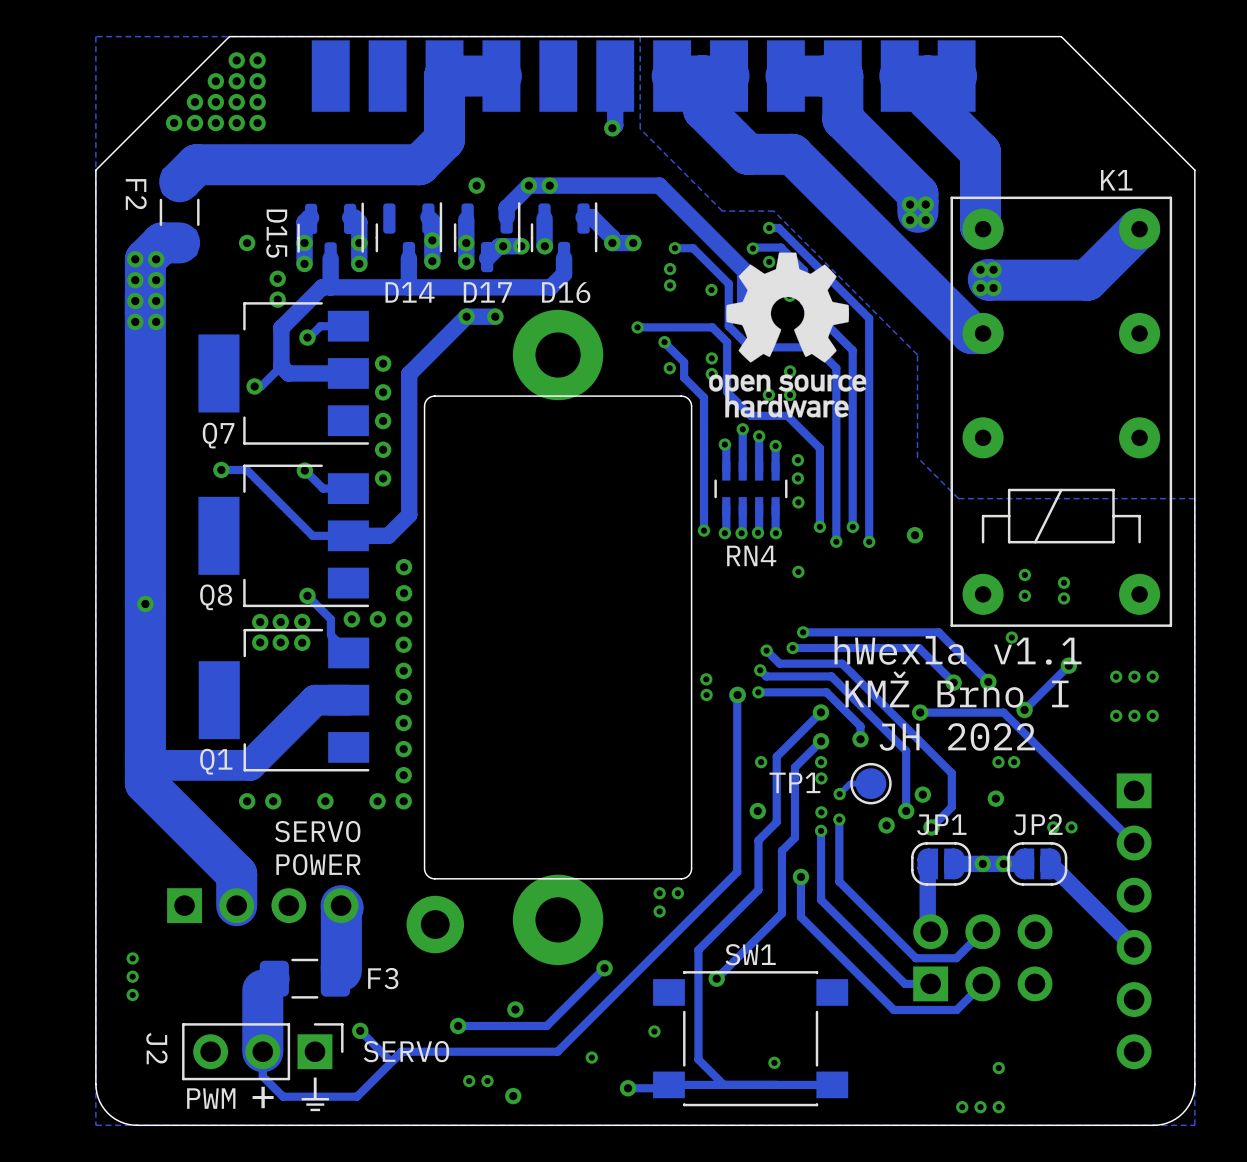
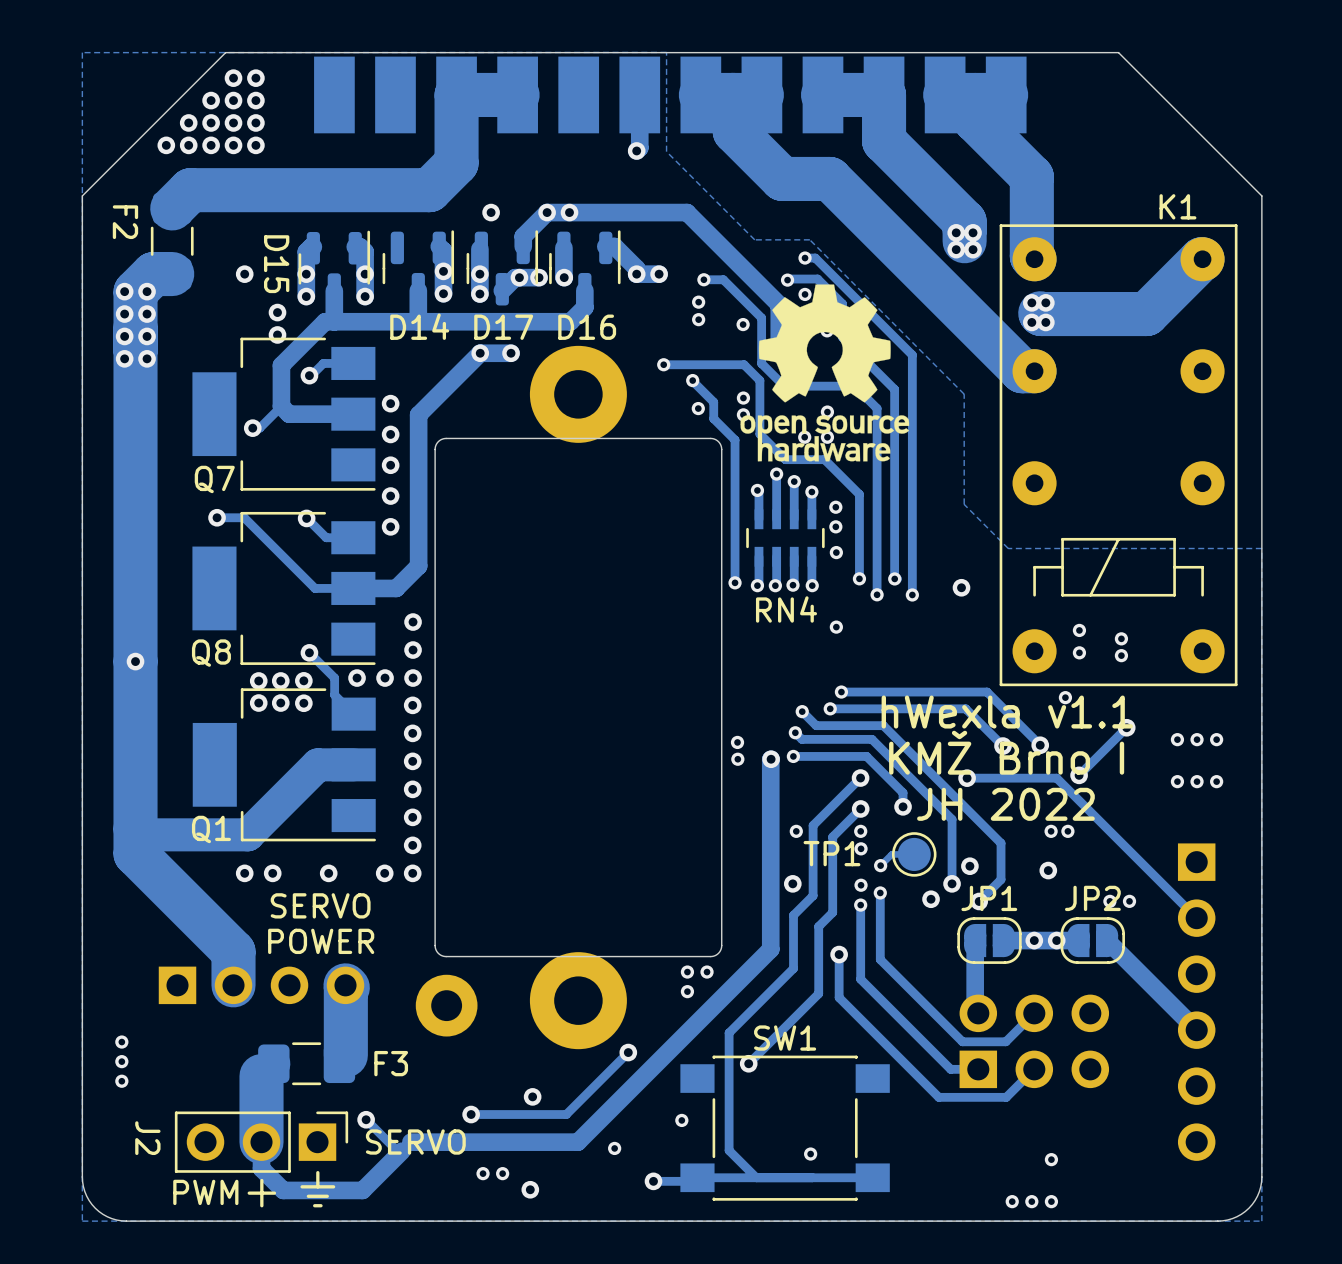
track width: thin (737, 695) (737, 872) (557, 1051) (402, 1051) -> thick (770, 759) (770, 949) (577, 1142) (410, 1142)
track width: thin (262, 1051) (262, 1076) (283, 1096) (357, 1096) (393, 1060) -> thick (261, 1142) (261, 1168) (283, 1190) (362, 1190) (401, 1151)

